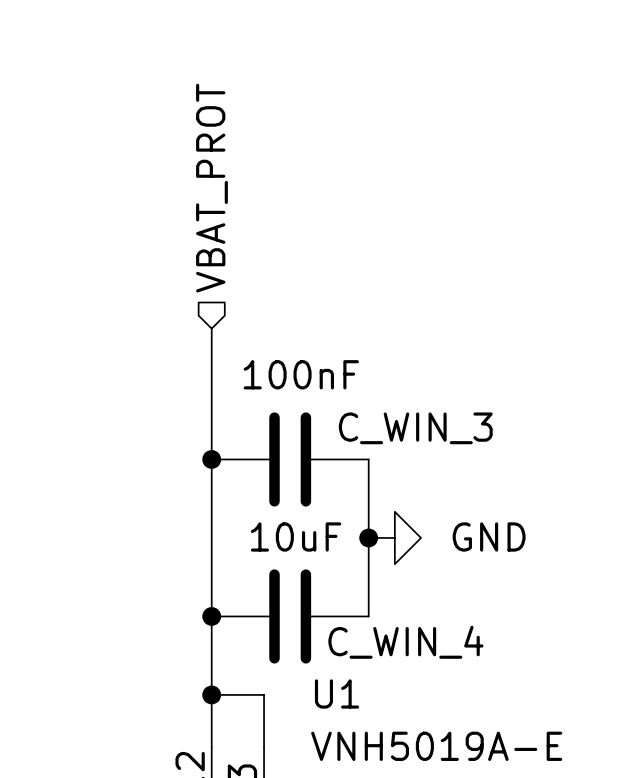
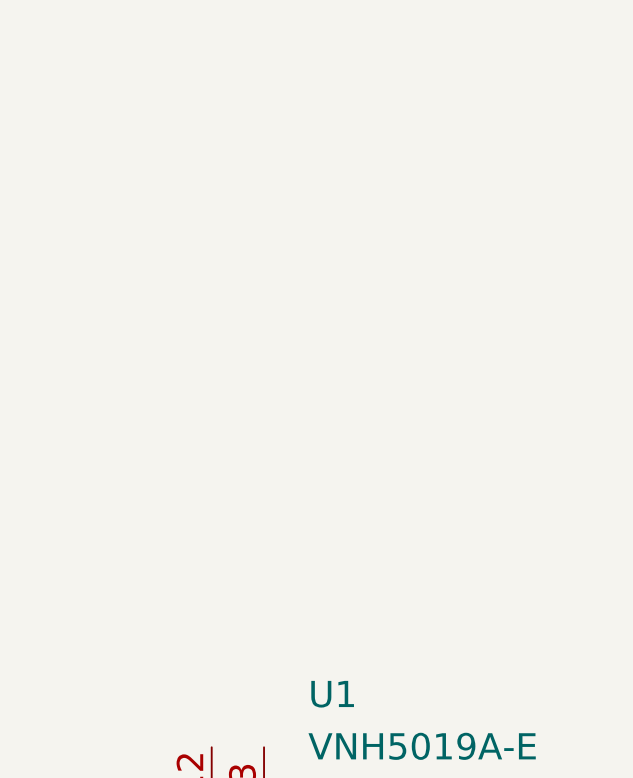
hierarchical label: VBAT_PROT (211, 188) -> none
wire: (211, 328) (211, 747) -> none
junction: (211, 459) -> none
C_WIN_3: 100nF (290, 459) -> none
wire: (368, 459) (368, 616) -> none
junction: (368, 537) -> none
power symbol: GND (394, 537) -> none
junction: (211, 616) -> none
C_WIN_4: 10uF (290, 616) -> none
wire: (211, 694) (264, 694) (264, 747) -> none
junction: (211, 694) -> none

